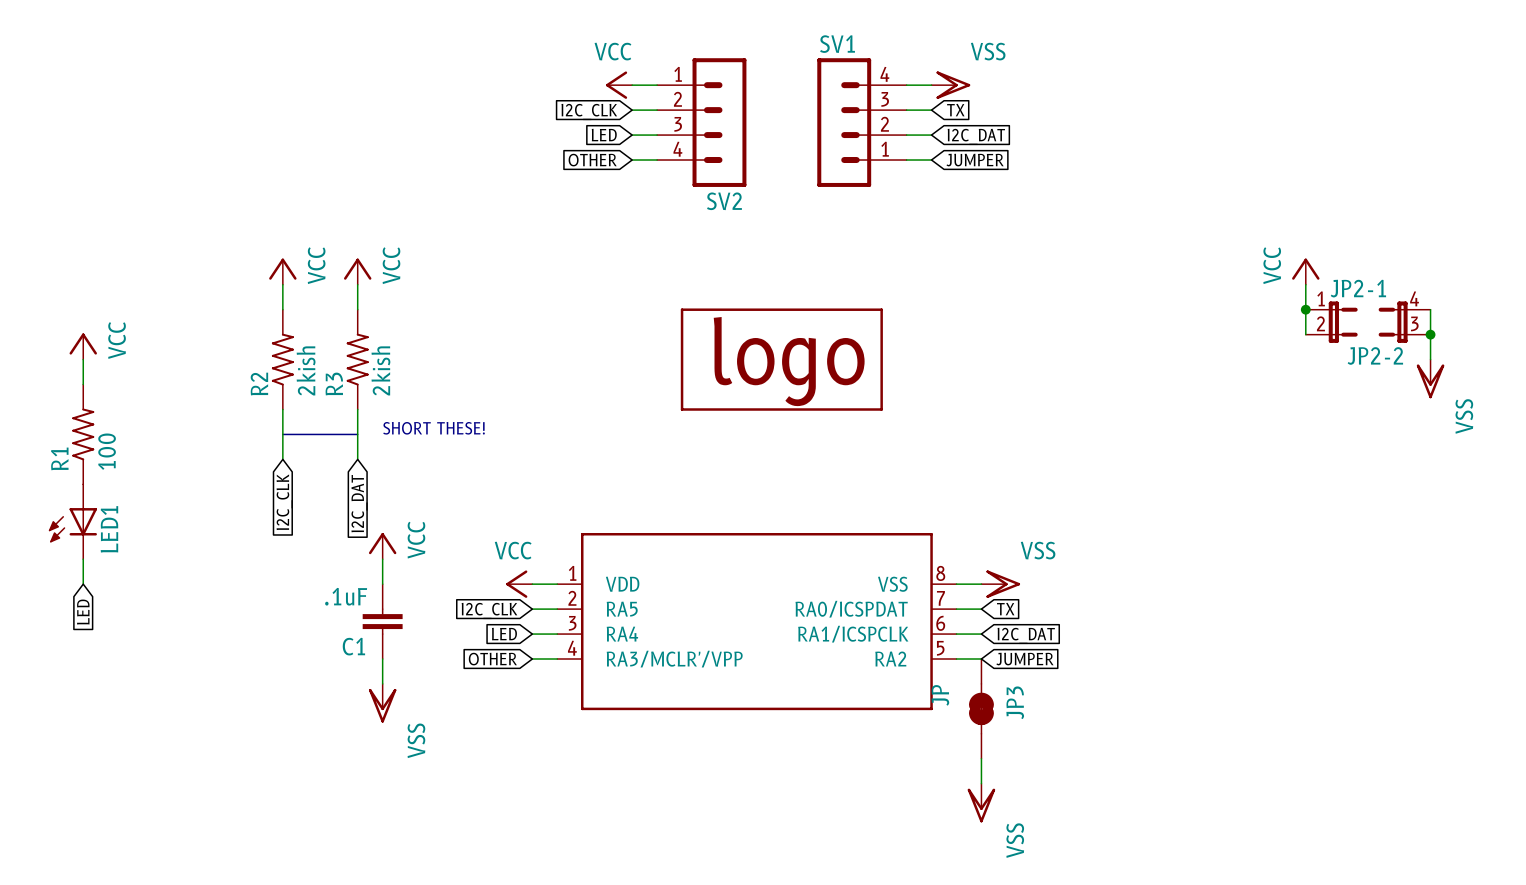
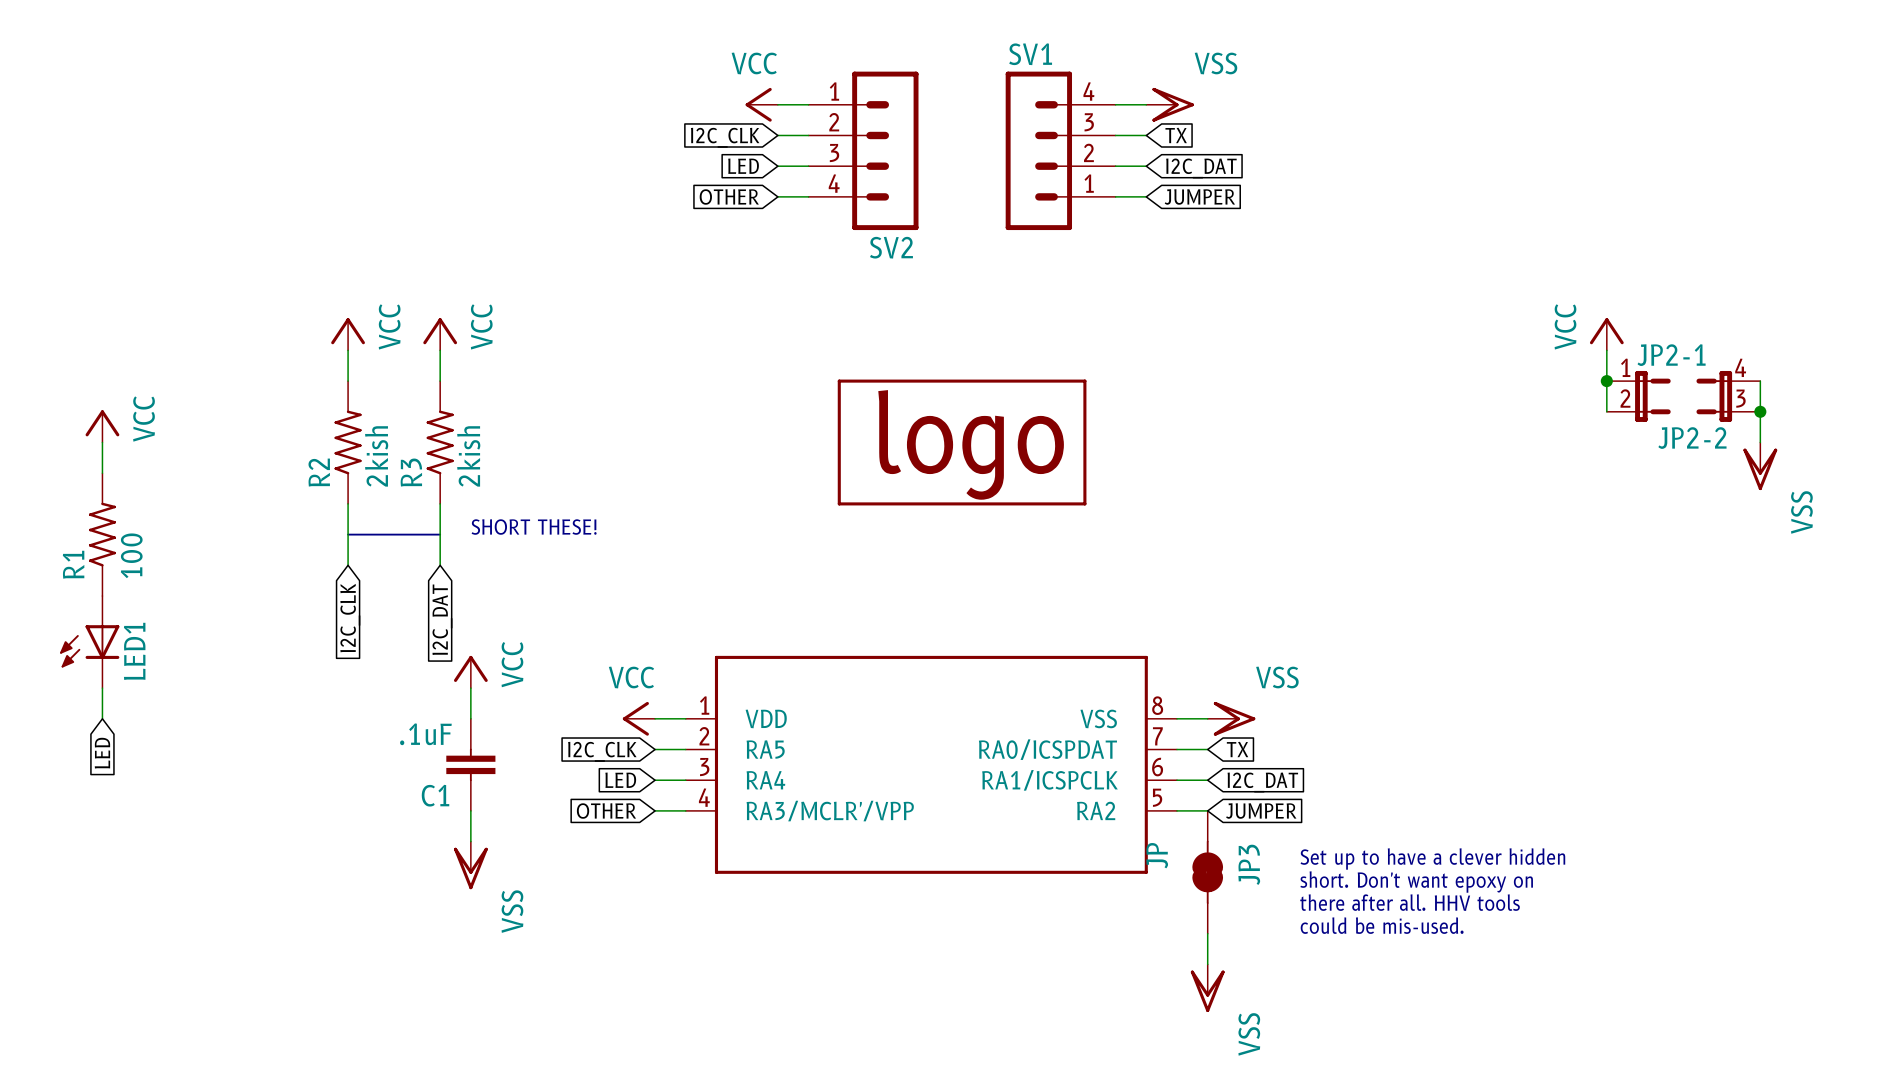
text: none -> Set up to have a clever hidden (1432, 858)
text: none -> short. Don't want epoxy on (1416, 882)
text: none -> there after all. HHV tools (1410, 902)
text: none -> could be mis-used. (1382, 925)

